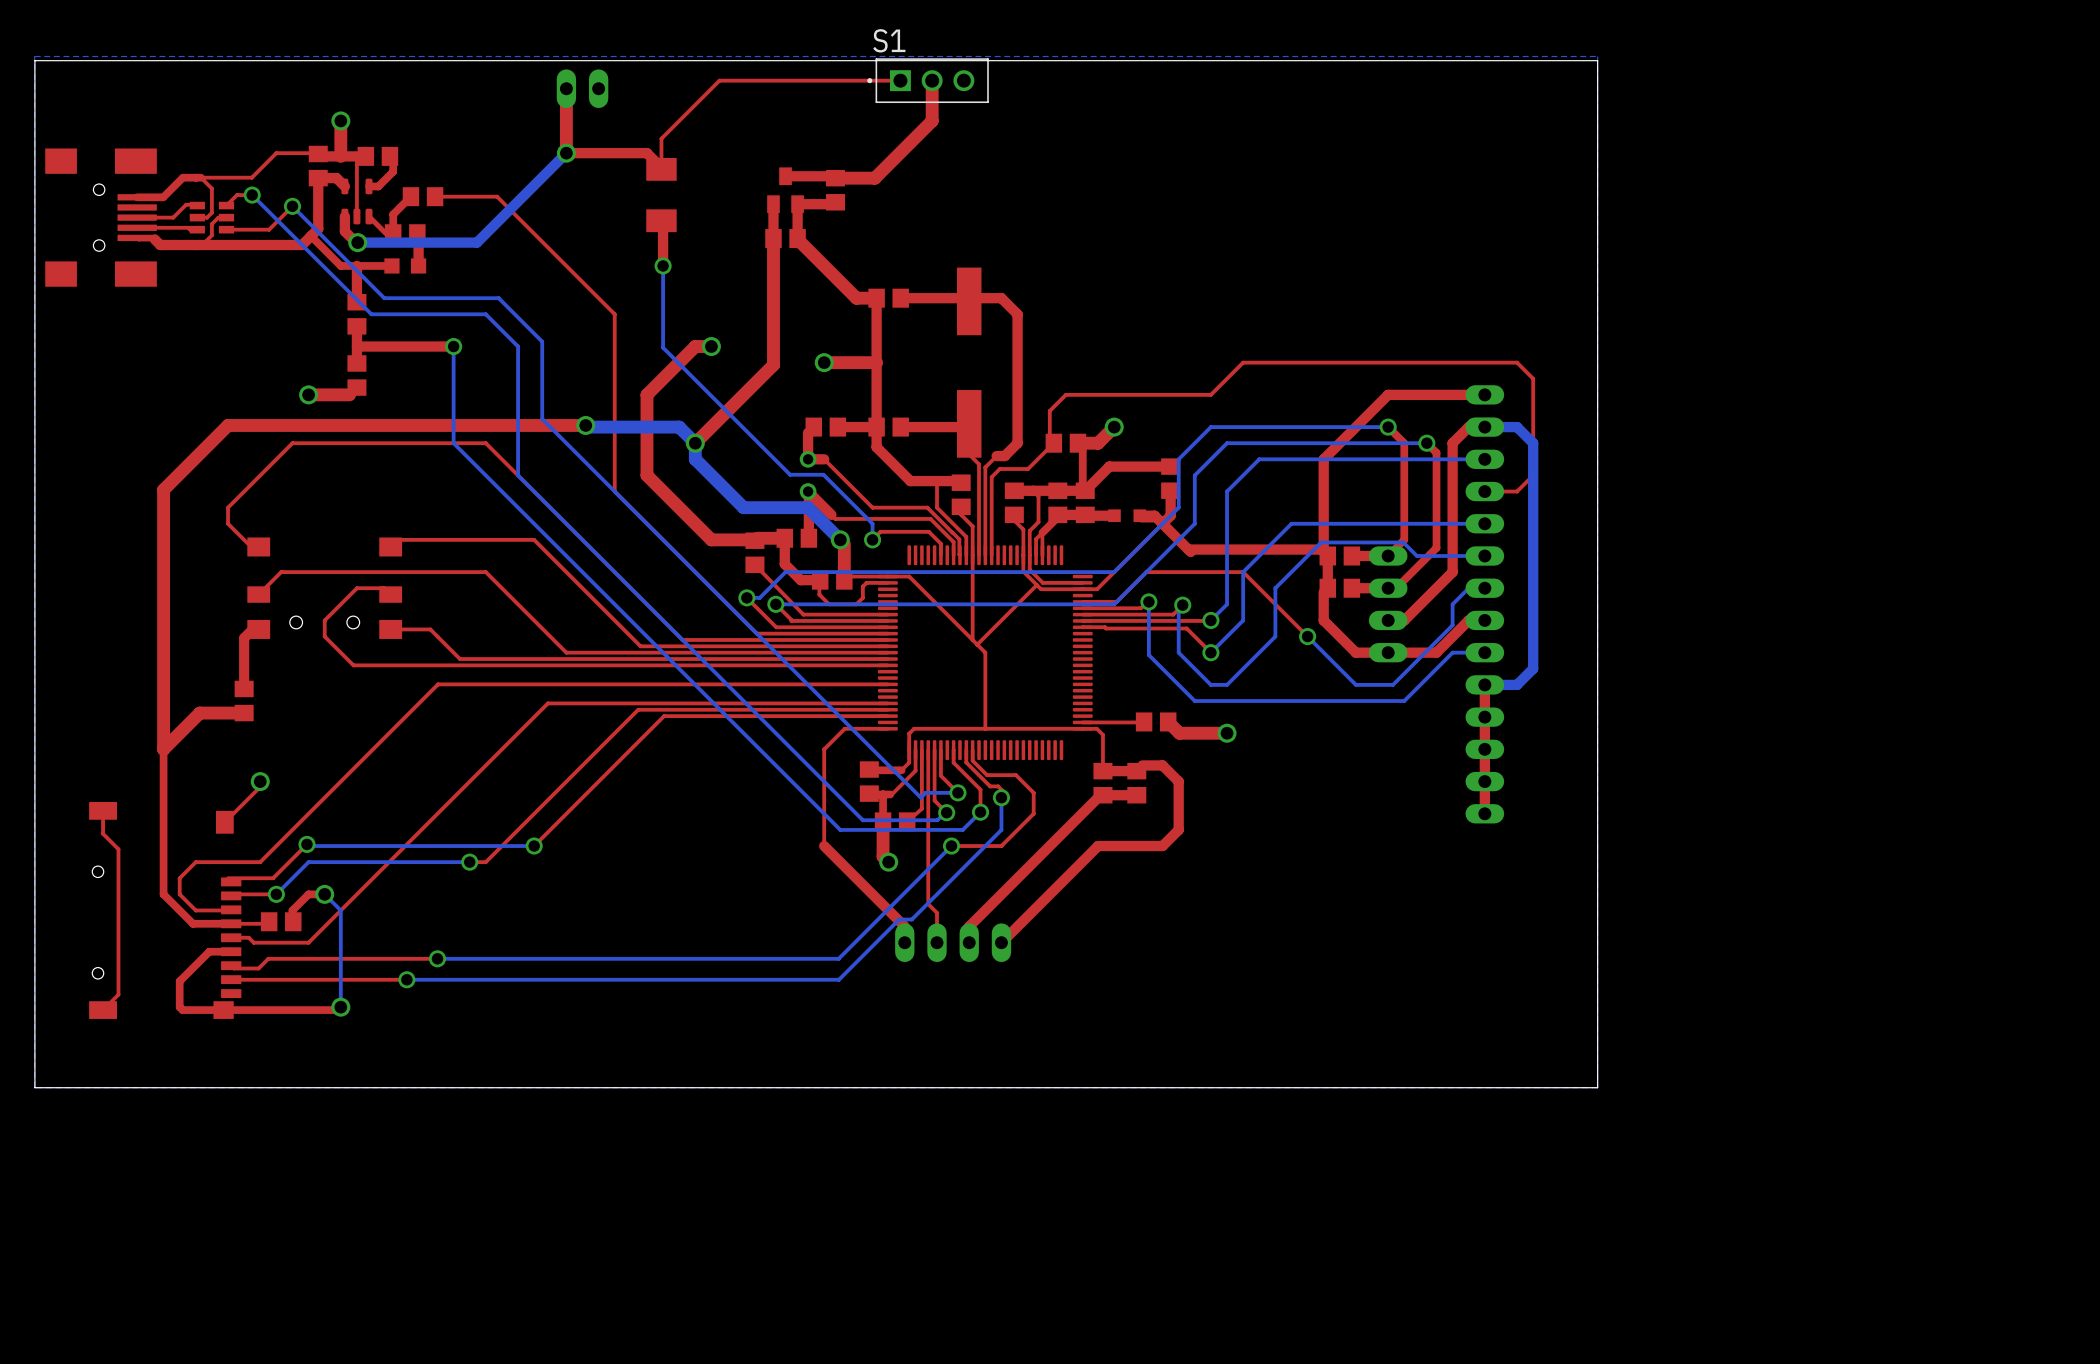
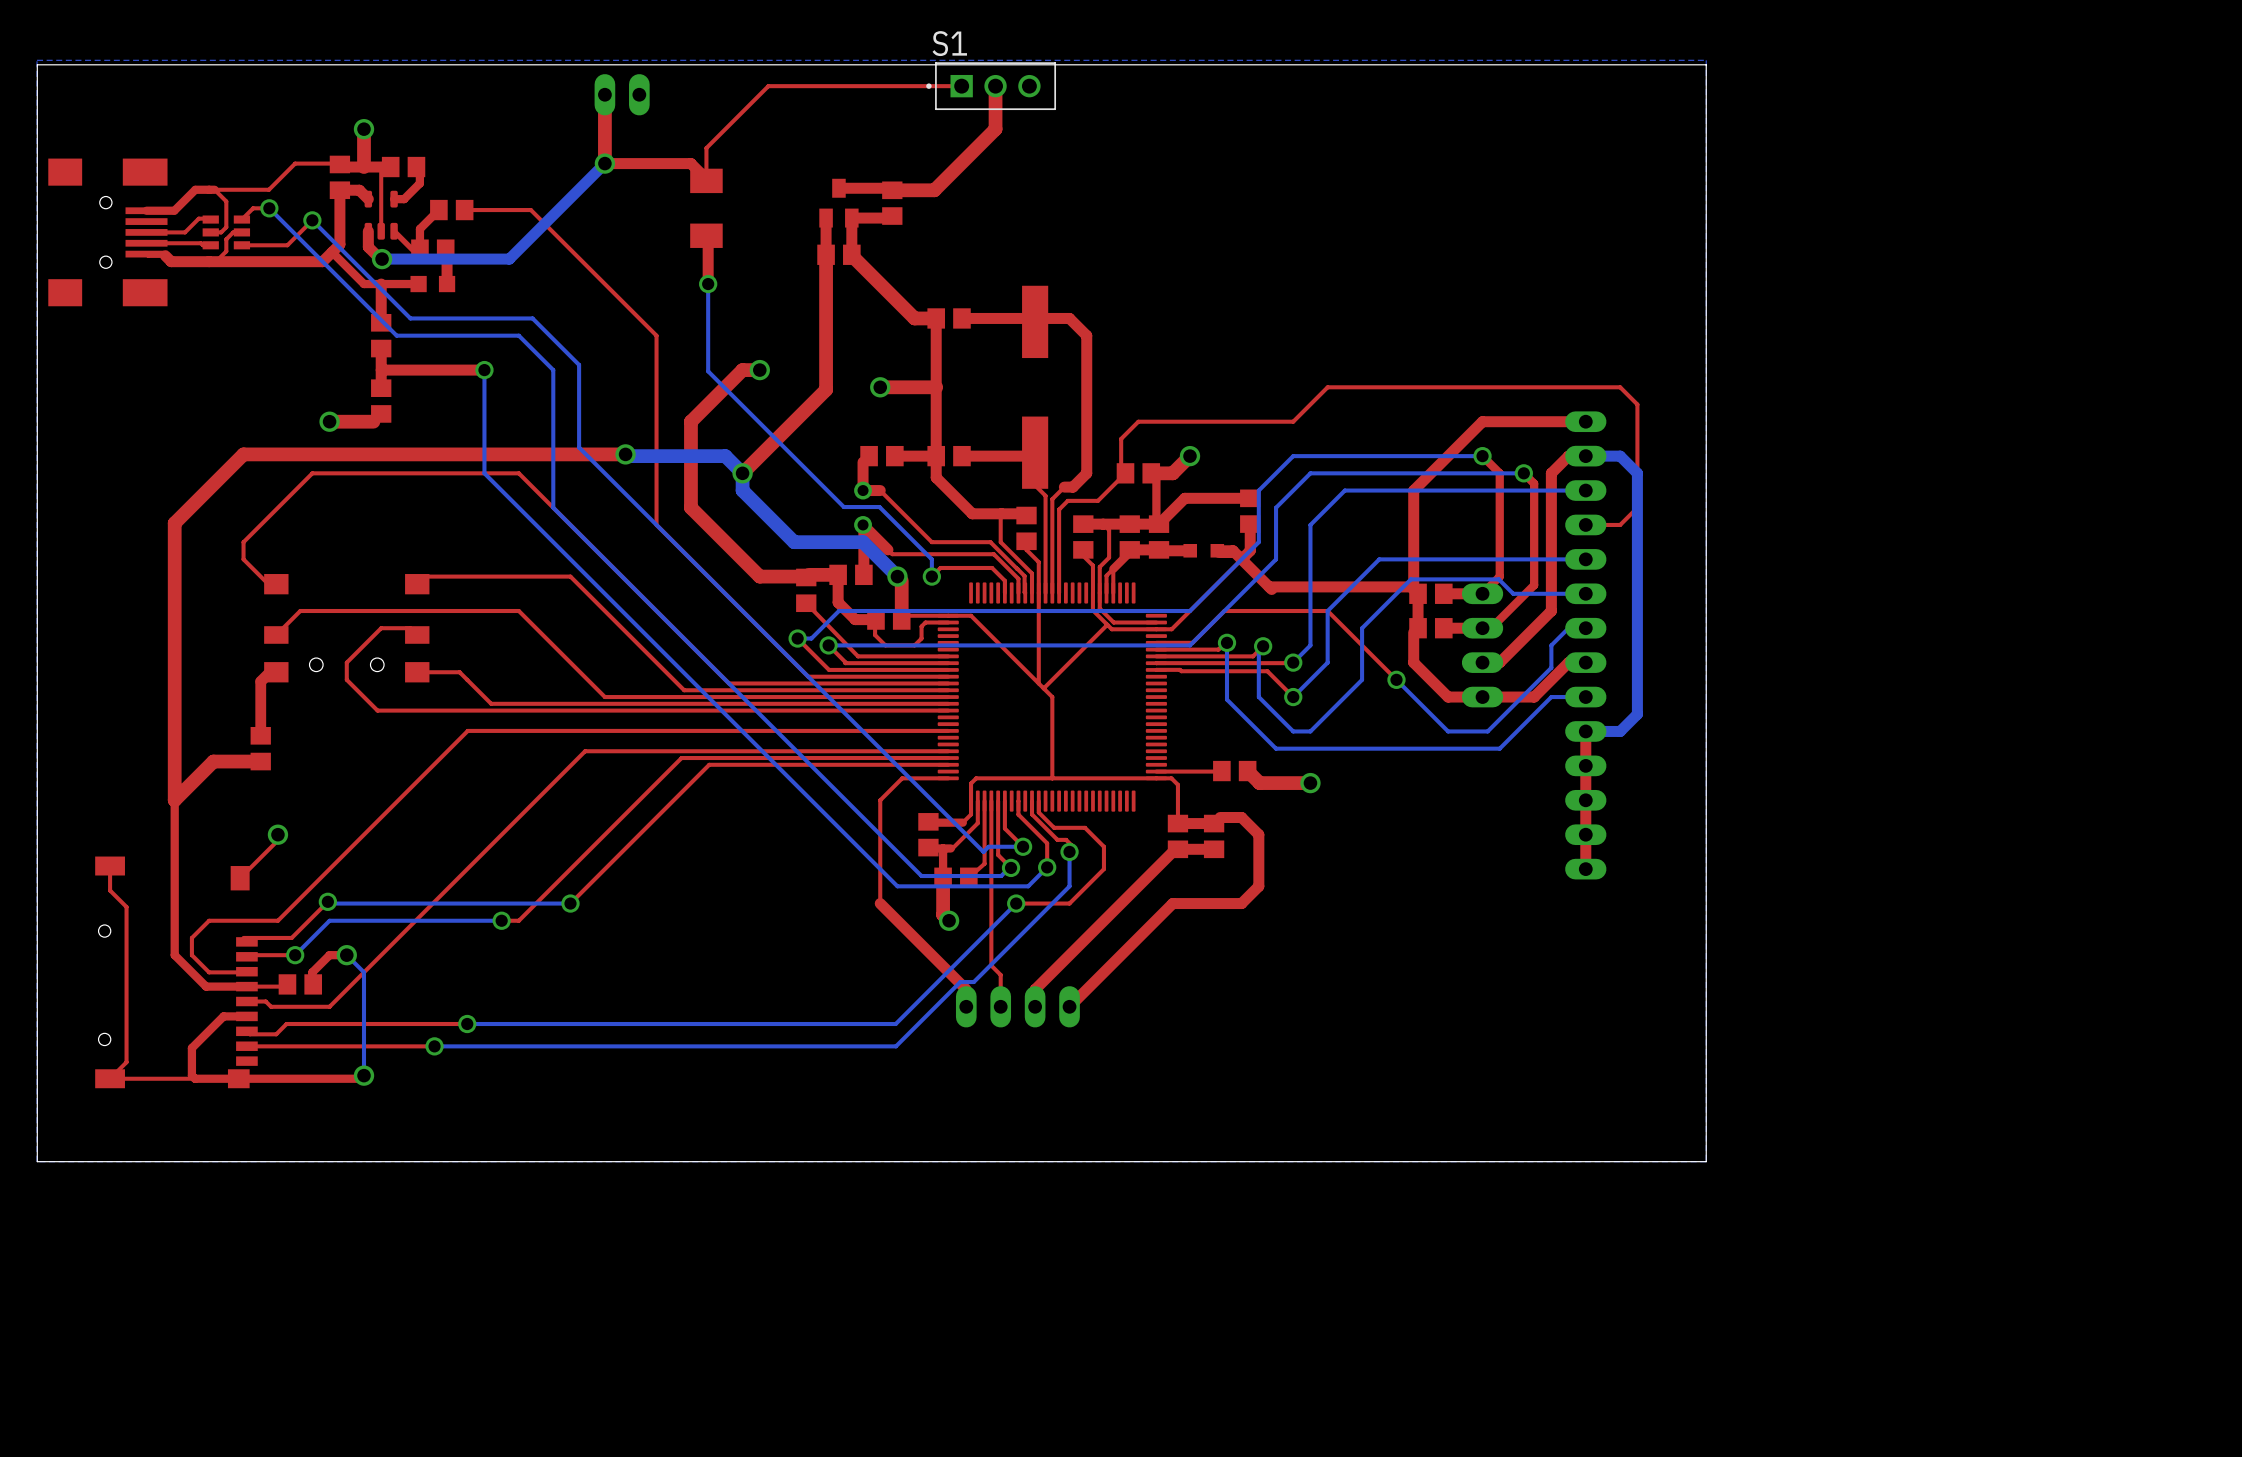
top track: none -> (195, 1078) (110, 1078)

